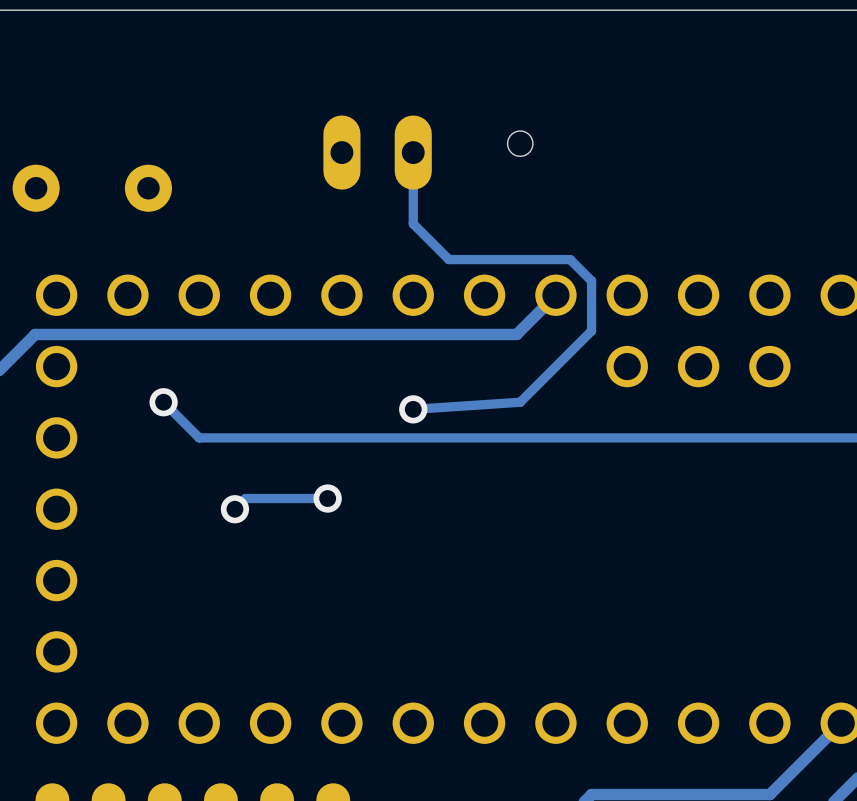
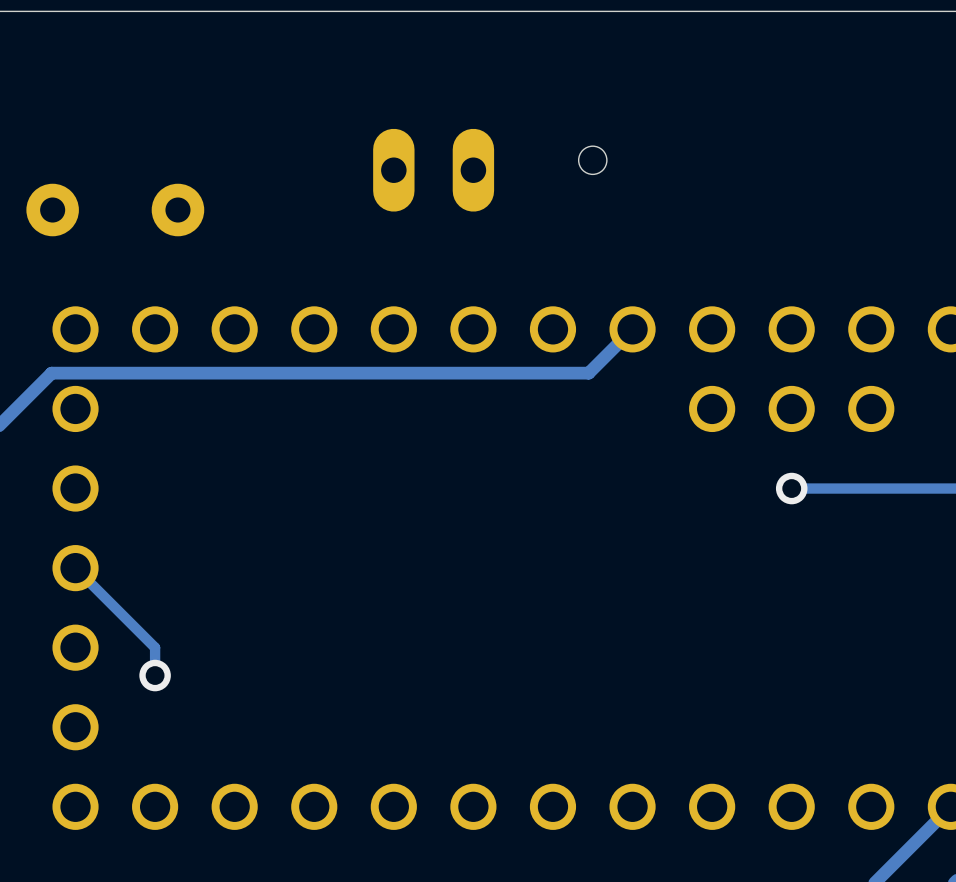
track: (413, 152) (413, 223) (448, 259) (570, 259) (591, 280) (591, 330) (520, 402) (413, 409) -> none
track: (163, 402) (199, 437) (698, 437) -> none
via: (163, 402) -> none
via: (413, 409) -> none
via: none -> (791, 488)
track: (327, 498) (245, 498) (234, 509) -> none
via: (327, 498) -> none
track: none -> (75, 568) (155, 647) (155, 675)
via: (234, 509) -> none
via: none -> (155, 675)

